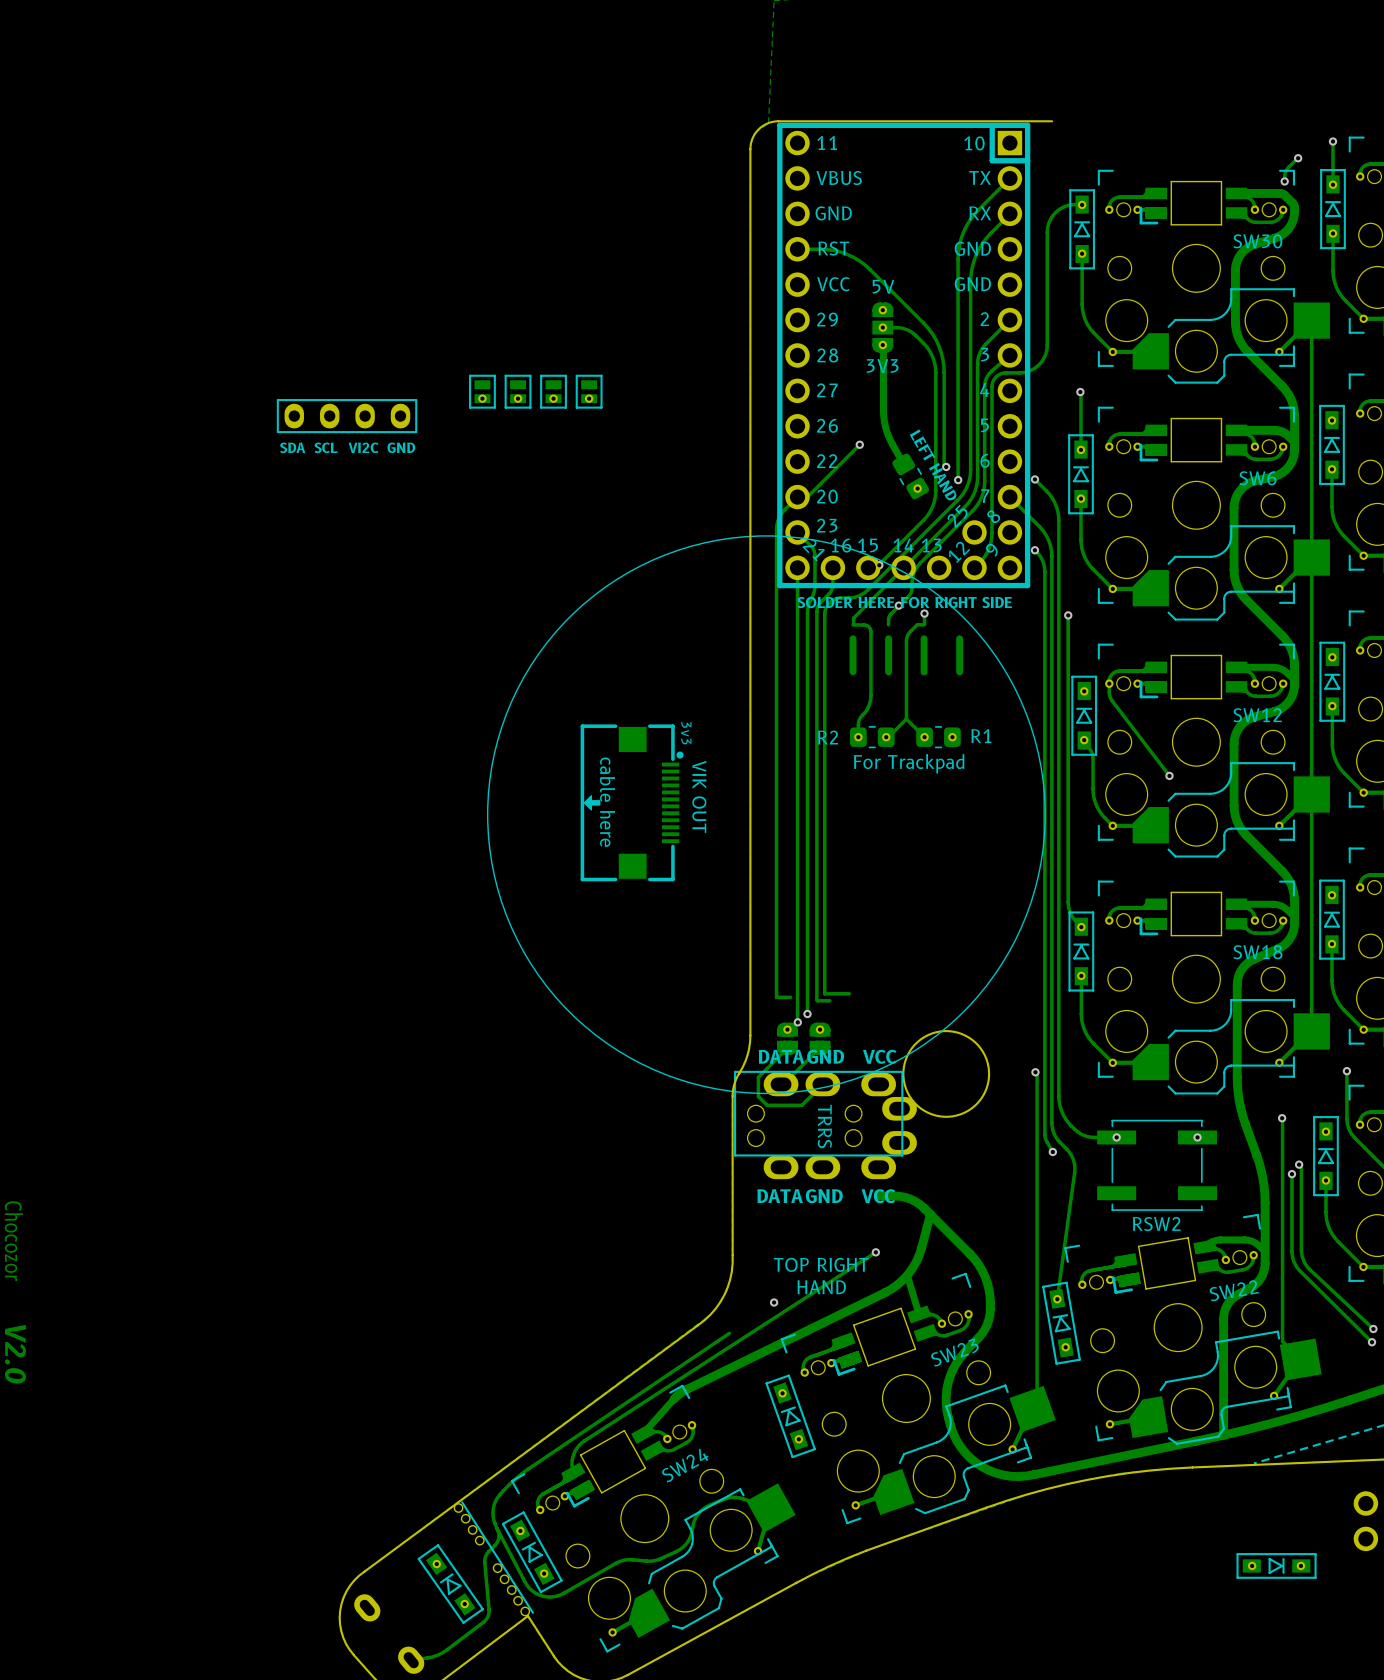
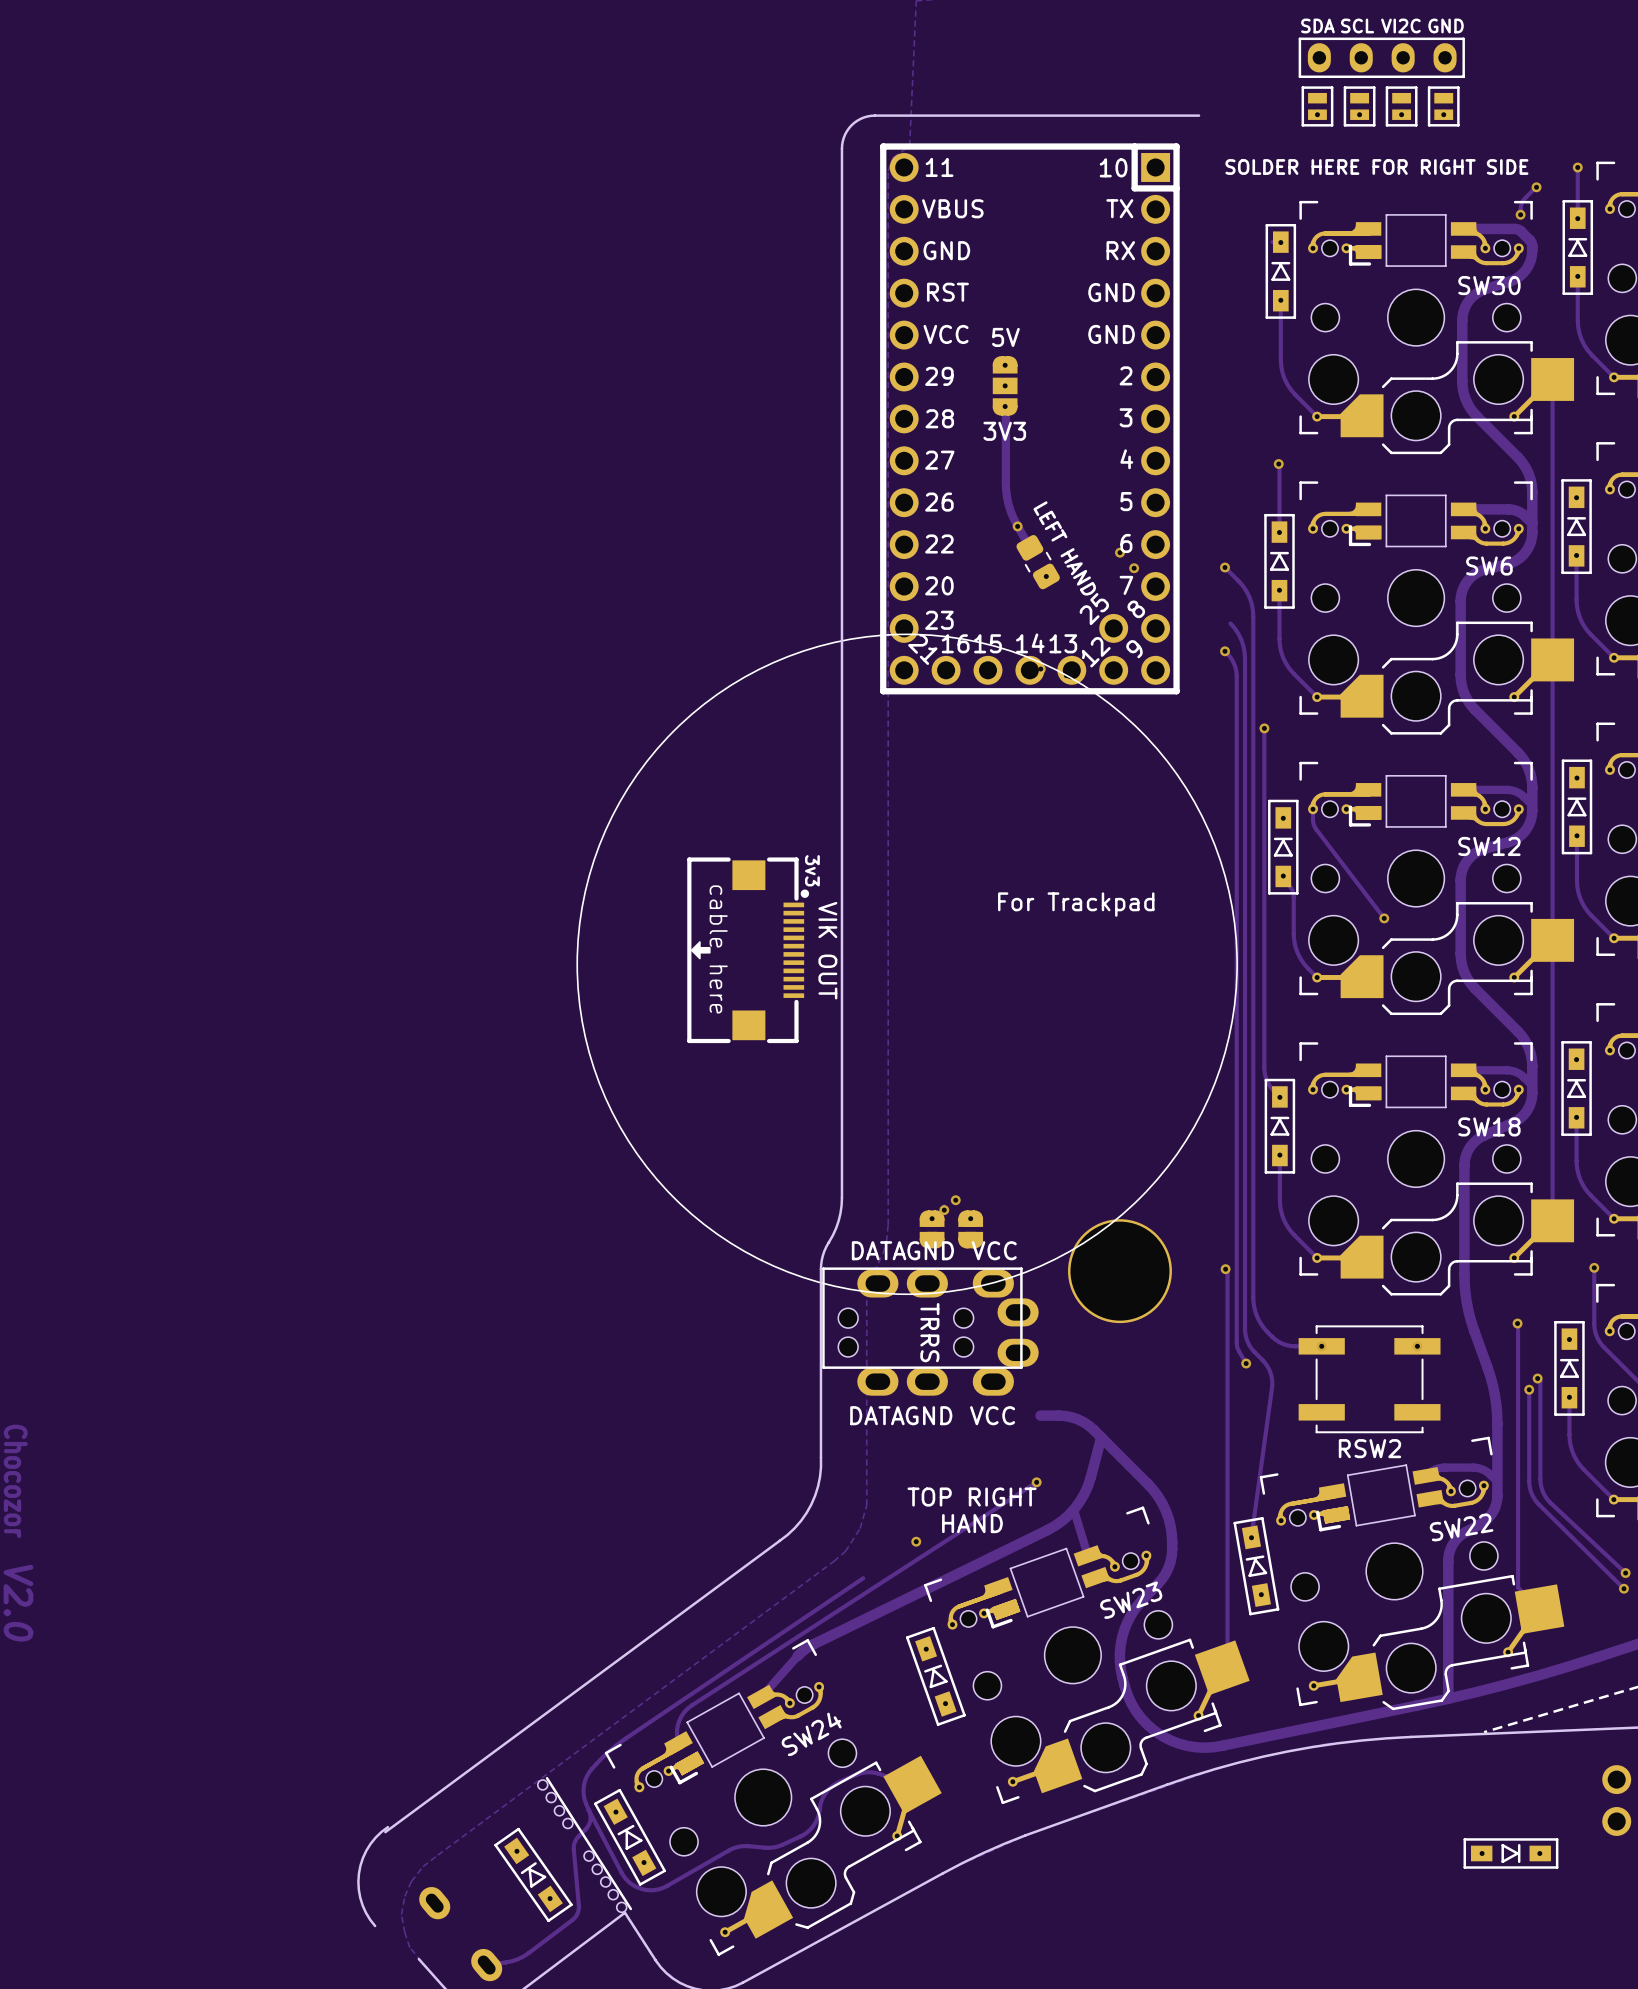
part: none -> (1381, 57)
part: none -> (1380, 106)
board edge: none -> (1199, 115) (874, 115) (857, 120) (845, 134) (841, 148) (841, 1197) (838, 1220) (824, 1250) (821, 1264) (820, 1467) (818, 1486) (806, 1512) (787, 1534) (385, 1832)
board edge: (1052, 121) (778, 121) (763, 125) (753, 137) (750, 149) (750, 1035) (747, 1055) (735, 1080) (732, 1091) (732, 1263) (730, 1279) (720, 1301) (704, 1320) (354, 1580) (343, 1597) (339, 1617) (343, 1637) (353, 1655) -> none
text: none -> SOLDER HERE FOR RIGHT SIDE (1376, 167)
track: (1009, 178) (973, 214) (966, 226) (959, 245) (958, 479) -> none
track: (1075, 204) (1065, 206) (1057, 210) (1051, 217) (1047, 226) (1047, 345) (1044, 357) (1039, 364) (1031, 370) (1022, 372) (1001, 373) (995, 378) (992, 383) (991, 537) (987, 552) (974, 567) -> none
track: (1009, 214) (982, 243) (971, 268) (970, 469) (967, 485) (958, 499) (868, 589) (855, 597) (834, 599) (827, 605) (825, 611) (824, 993) (849, 993) -> none
track: (797, 249) (834, 250) (859, 260) (932, 333) (938, 345) (943, 365) (944, 464) (946, 466) -> none
track: (1009, 320) (983, 346) (978, 358) (977, 476) (972, 496) (965, 506) (853, 618) (853, 624) -> none
track: (882, 327) (899, 327) (910, 331) (926, 346) (933, 360) (935, 372) (935, 490) (932, 506) (926, 517) (879, 565) -> none
part position: (882, 327) -> (1005, 385)
track: (883, 346) (884, 421) (889, 438) (903, 464) -> (1005, 408) (1007, 497) (1013, 517) (1029, 547)
part position: (903, 355) -> (1029, 418)
track: (1009, 356) (990, 372) (985, 382) (984, 481) (981, 497) (972, 511) (917, 565) (913, 575) (910, 593) (890, 615) (888, 624) -> none
part: (535, 391) -> none
part: (347, 416) -> none
track: (859, 444) (807, 497) -> none
part position: (910, 476) -> (1038, 562)
track: (797, 497) (781, 514) (776, 529) (776, 997) (790, 997) -> none
track: (1009, 497) (1039, 526) -> none
track: (797, 532) (811, 546) (814, 555) (814, 588) (807, 613) (807, 1014) -> none
track: (832, 567) (831, 589) (819, 604) (816, 611) (816, 1000) (829, 1000) -> none
track: (797, 568) (797, 1022) -> none
text: SOLDER HERE FOR RIGHT SIDE (904, 602) -> none
via: (898, 605) -> none
track: (924, 613) (924, 624) -> none
via: (924, 613) -> none
track: (853, 624) (866, 625) (870, 631) (870, 698) (867, 709) (858, 721) (858, 737) -> none
track: (924, 624) (917, 624) (906, 638) (906, 719) -> none
track: (852, 638) (852, 671) -> none
track: (888, 638) (888, 671) -> none
track: (924, 638) (924, 672) -> none
track: (959, 638) (959, 671) -> none
track: (906, 719) (888, 737) -> none
track: (906, 719) (924, 737) -> none
R2: (872, 737) -> none
R1: (938, 737) -> none
track: (787, 1047) (758, 1077) (758, 1096) (767, 1105) (801, 1105) (822, 1084) -> none
track: (820, 1047) (783, 1084) -> none
part position: (825, 1124) -> (930, 1331)
board edge: none -> (387, 1827) (375, 1837) (366, 1850) (358, 1873) (358, 1889) (362, 1905) (375, 1926)

